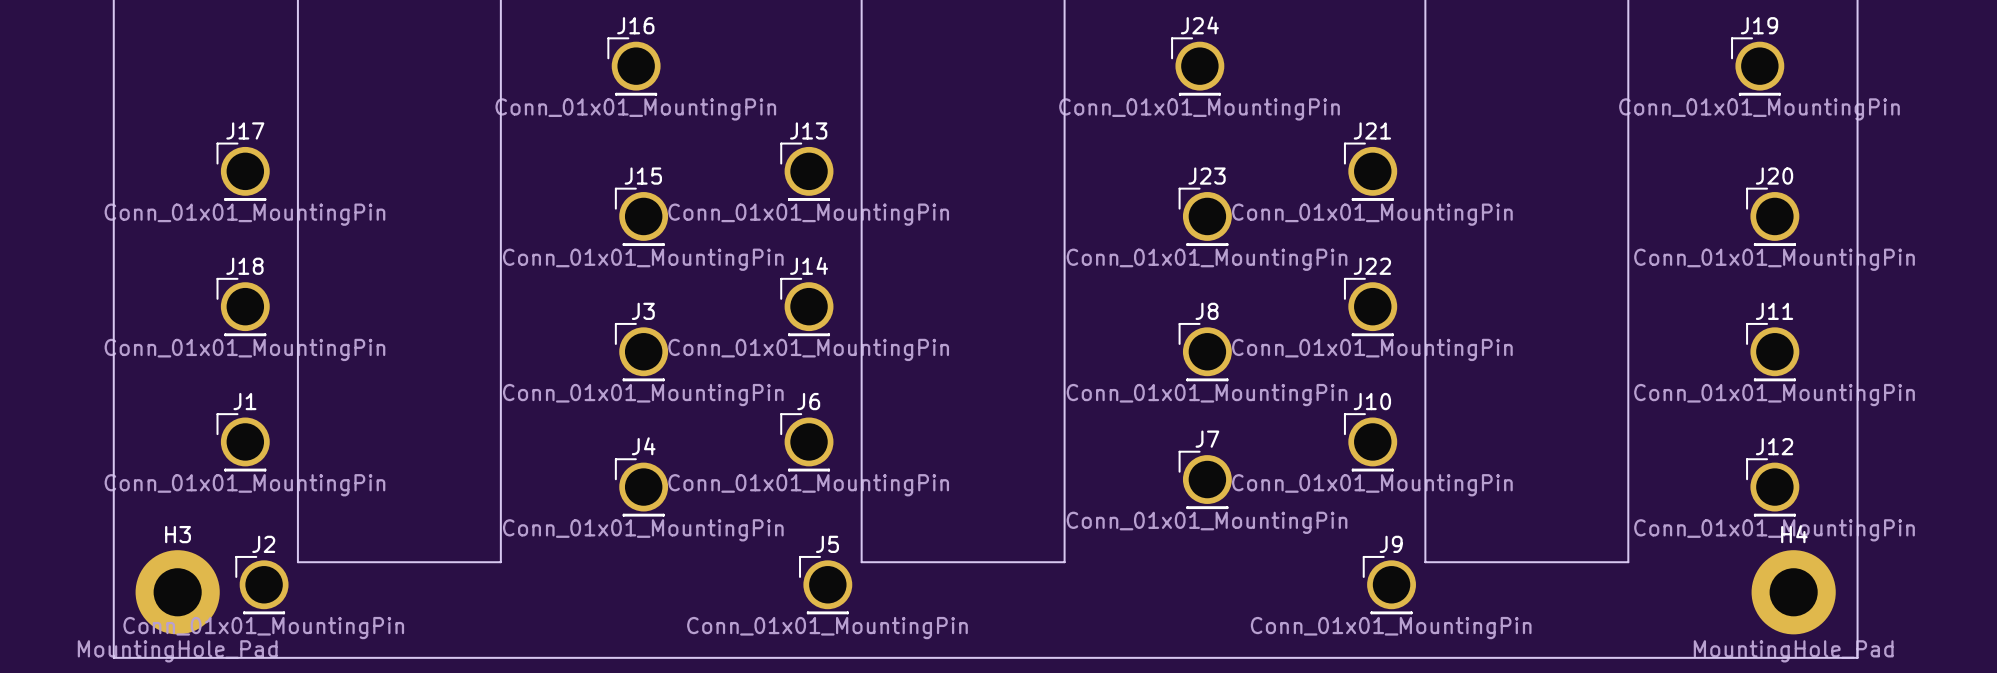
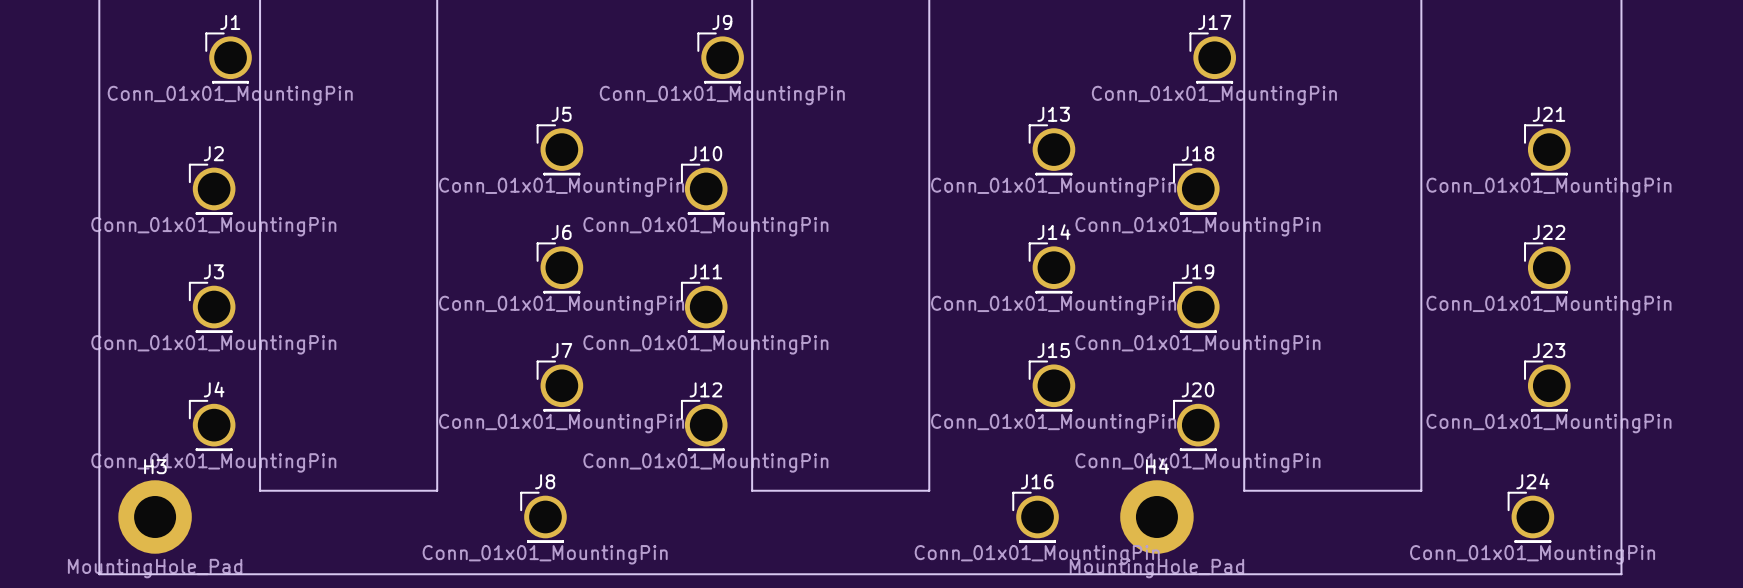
J16 position: (634, 66) -> (1035, 517)
J24 position: (1197, 66) -> (1531, 517)
J19 position: (1757, 66) -> (1196, 307)
J17 position: (243, 171) -> (1212, 58)
J13 position: (806, 171) -> (1052, 149)
J21 position: (1370, 171) -> (1547, 149)
J15 position: (641, 216) -> (1052, 386)
J23 position: (1205, 216) -> (1547, 386)
J20 position: (1772, 216) -> (1196, 425)
J18 position: (243, 307) -> (1196, 189)
J14 position: (806, 307) -> (1052, 268)
J22 position: (1370, 307) -> (1547, 268)
J3 position: (641, 352) -> (212, 307)
J8 position: (1205, 352) -> (543, 517)
J11 position: (1772, 352) -> (704, 307)
J1 position: (243, 442) -> (228, 58)
J6 position: (806, 442) -> (559, 268)
J10 position: (1370, 442) -> (704, 189)
J7 position: (1205, 479) -> (559, 386)
J4 position: (641, 487) -> (212, 425)
J12 position: (1772, 487) -> (704, 425)
J2 position: (261, 585) -> (212, 189)
J5 position: (825, 585) -> (559, 149)
J9 position: (1389, 585) -> (720, 58)
H4 position: (1793, 592) -> (1156, 516)

